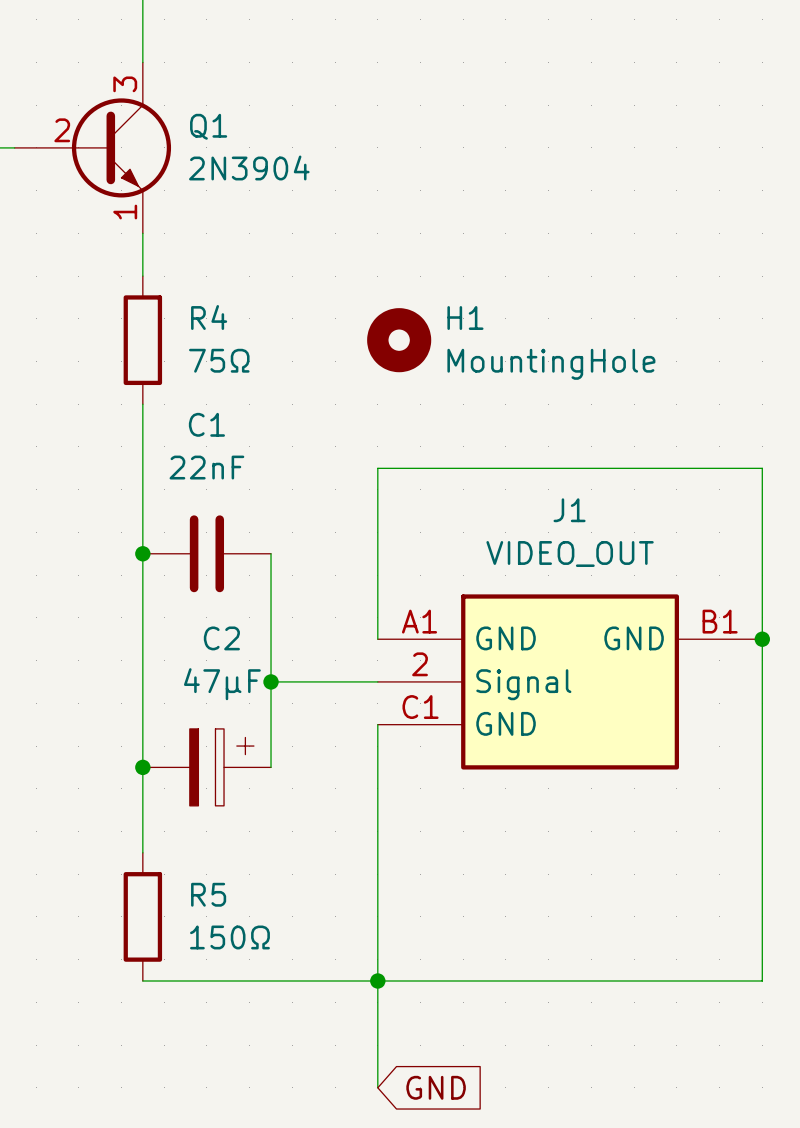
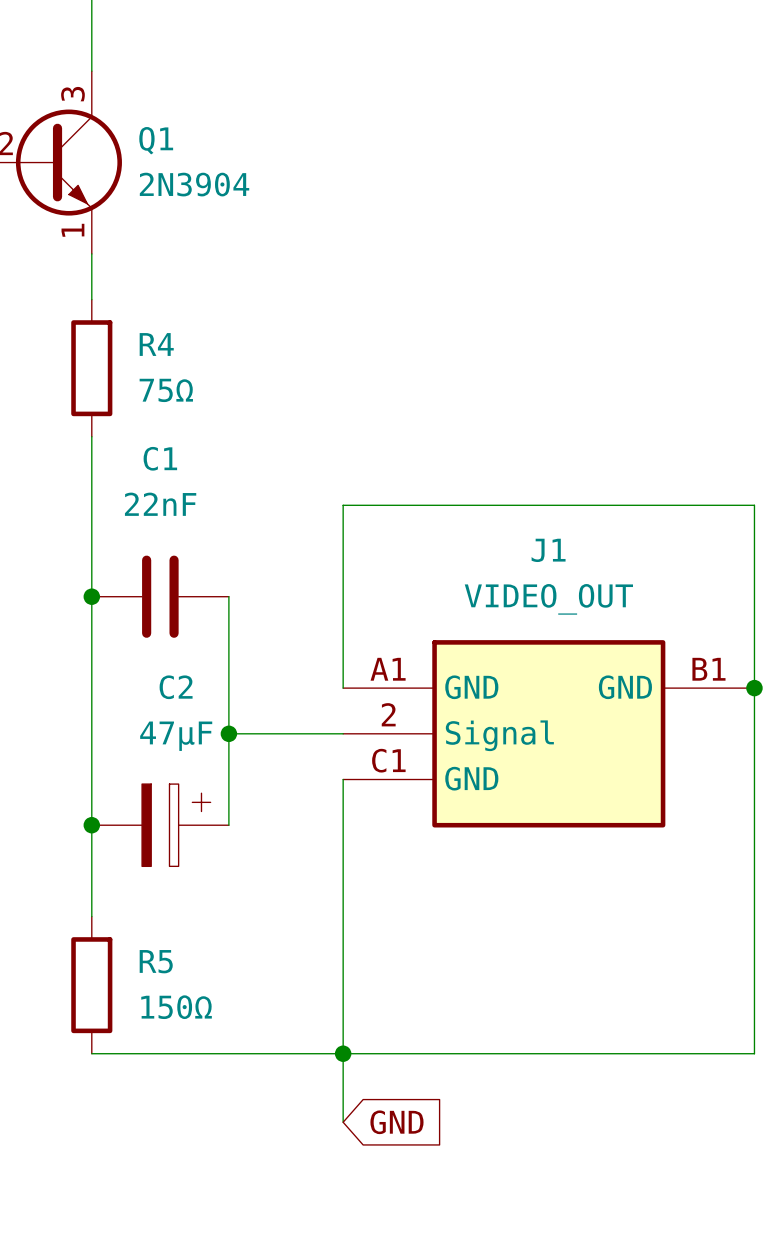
H1: MountingHole (399, 340) -> none
wire: (377, 1045) (377, 1087) -> none
global label position: GND (436, 1087) -> GND (396, 1122)

